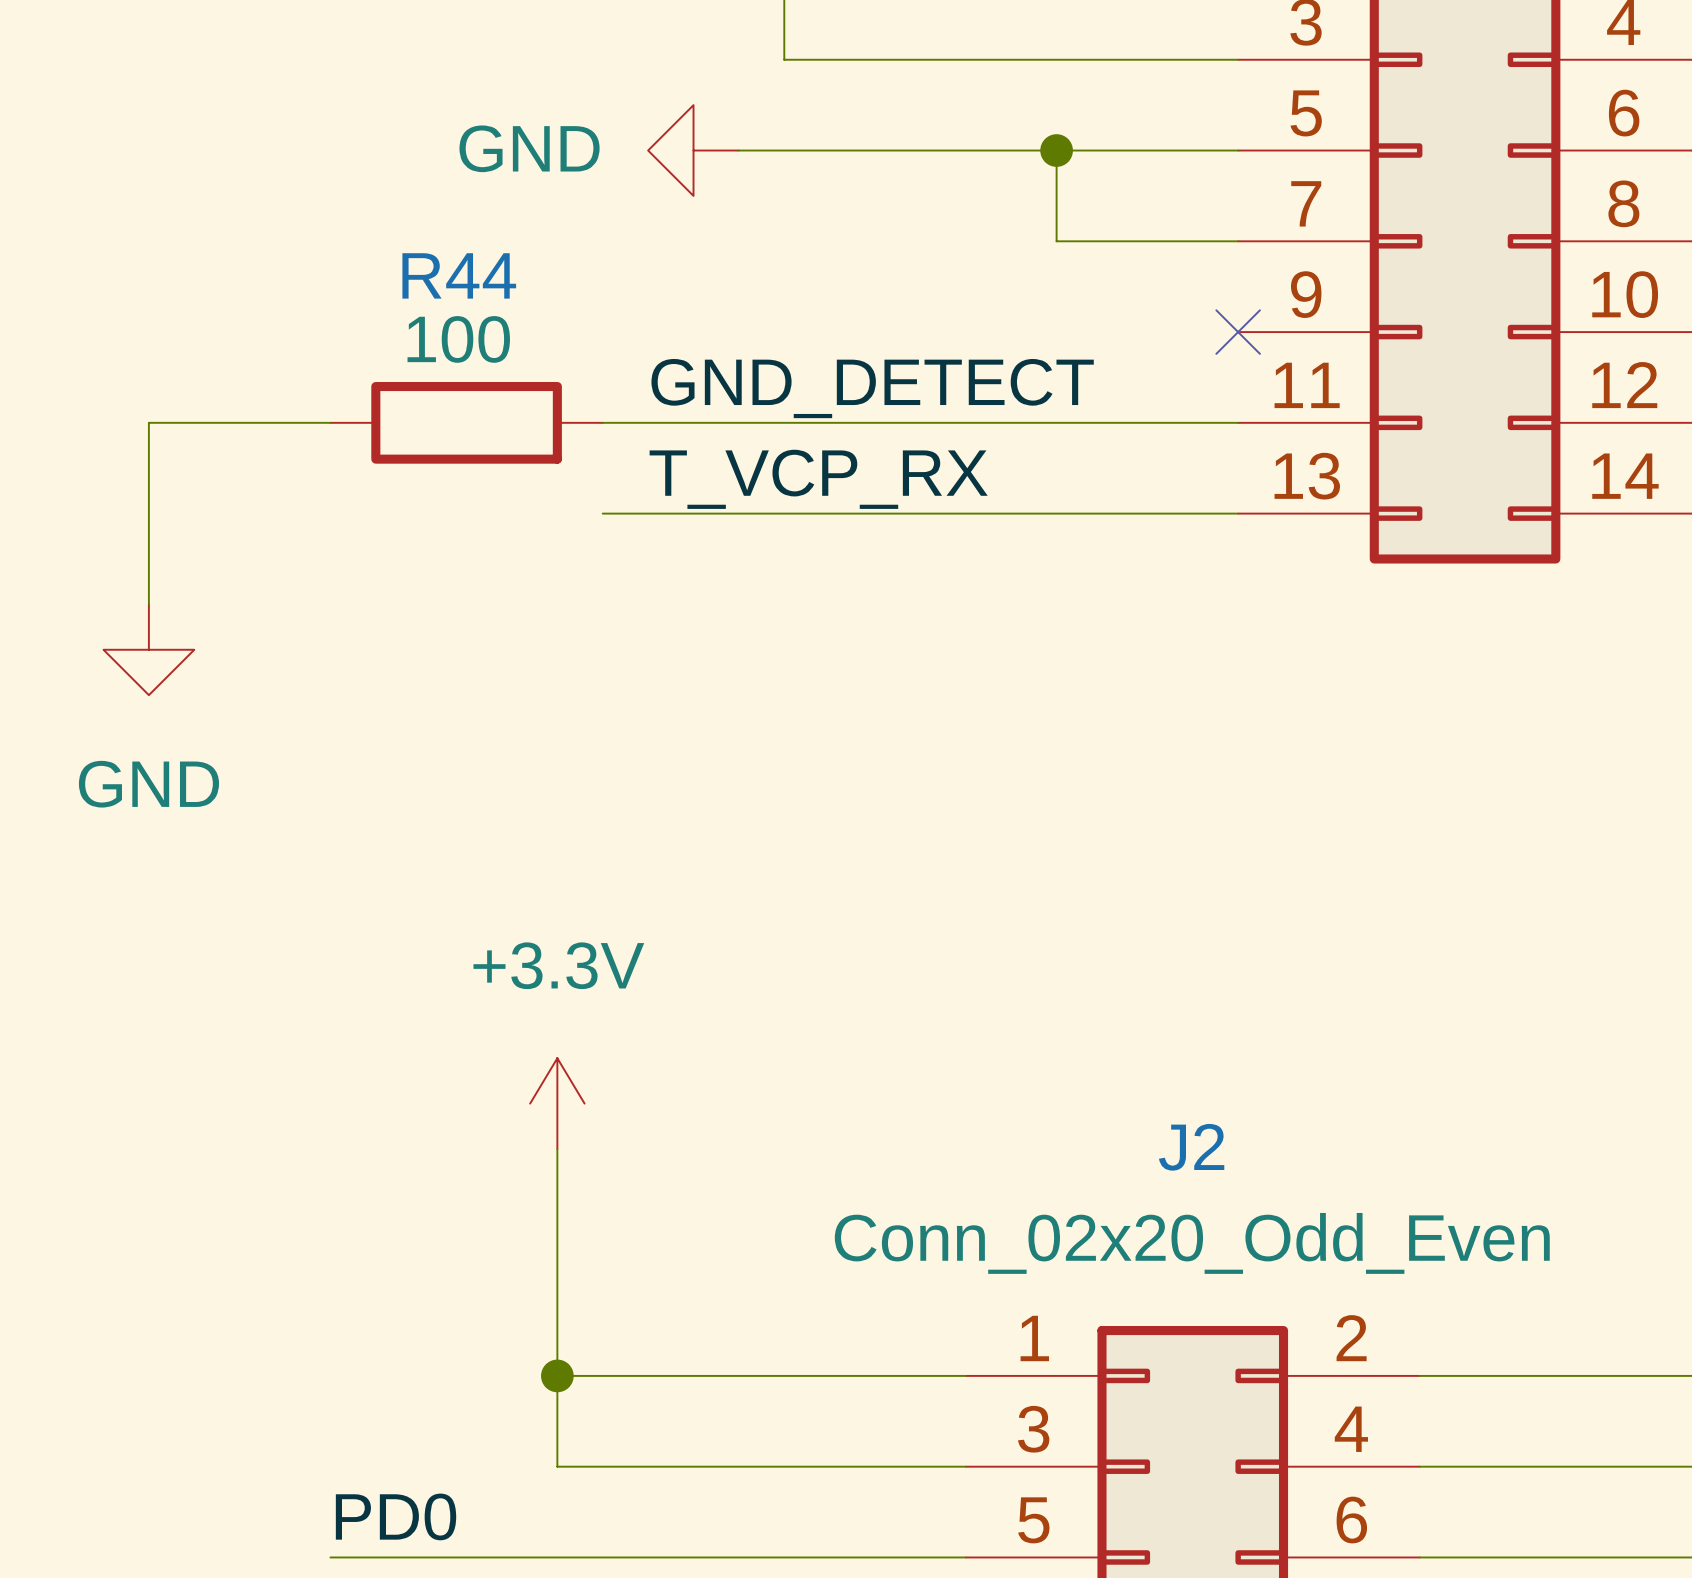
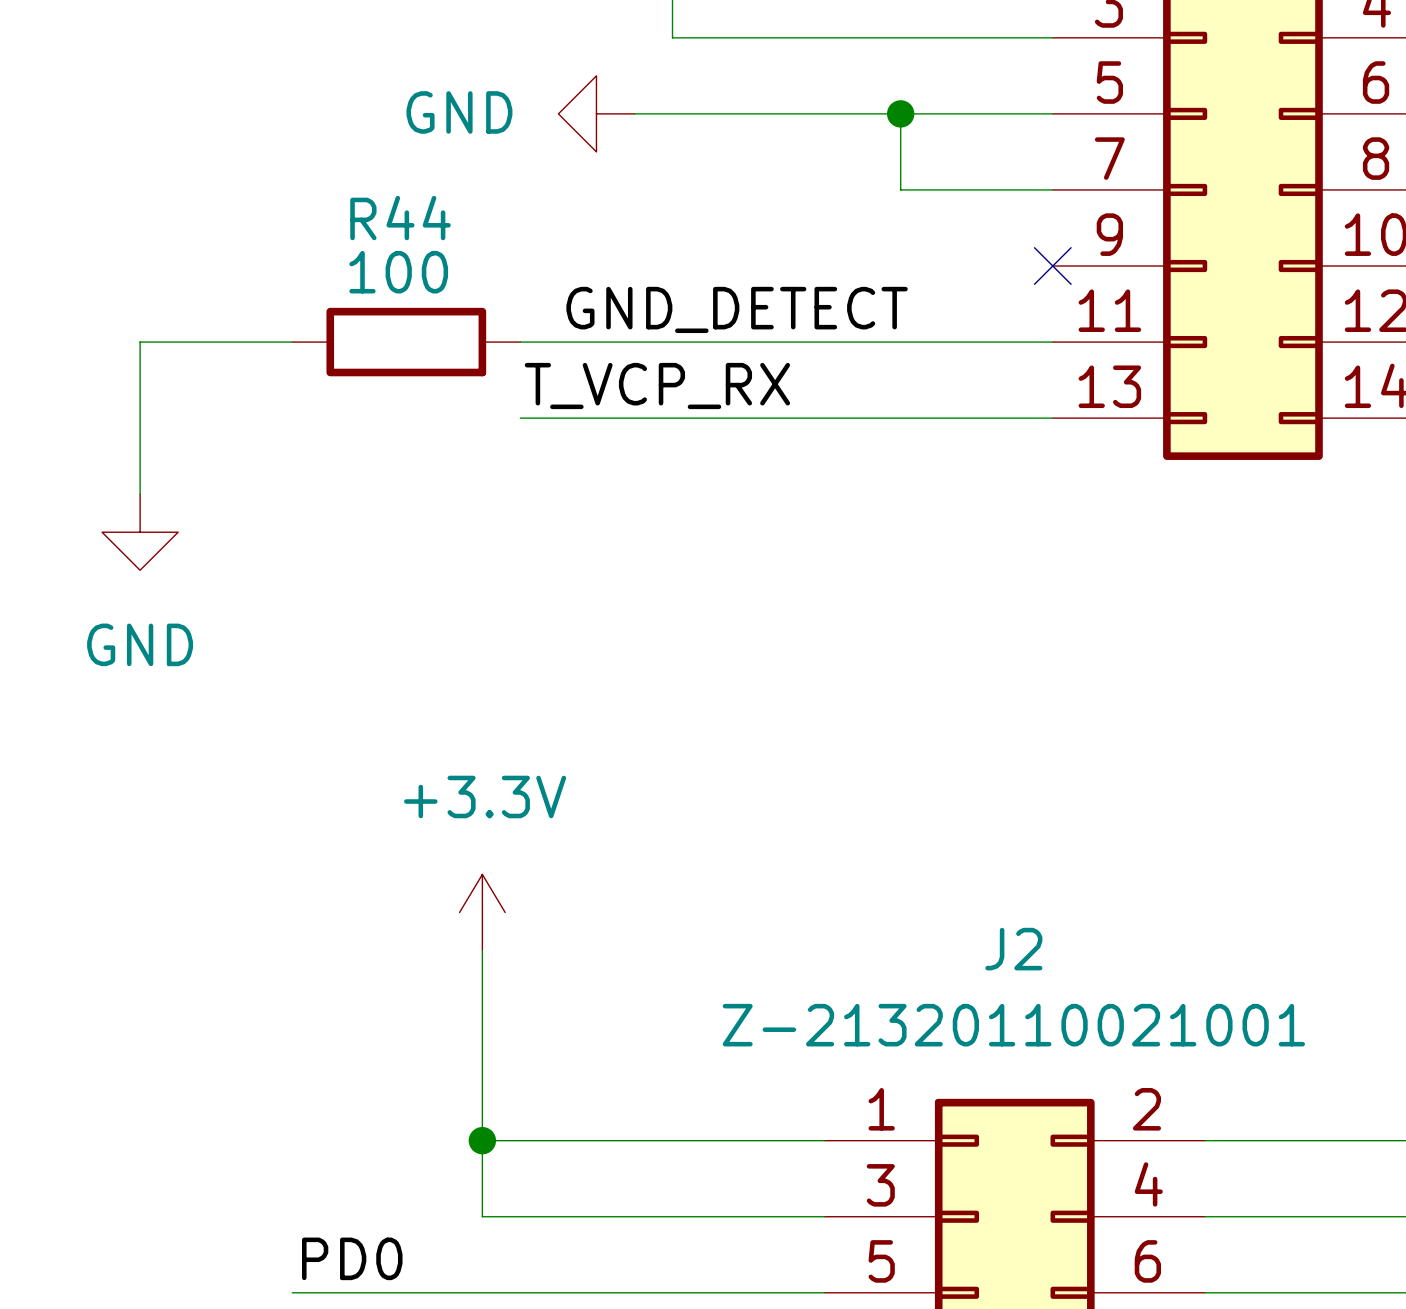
label position: T_VCP_RX (818, 479) -> T_VCP_RX (657, 386)
J2 value: Conn_02x20_Odd_Even (1192, 1243) -> Z-21320110021001 (1013, 1025)

